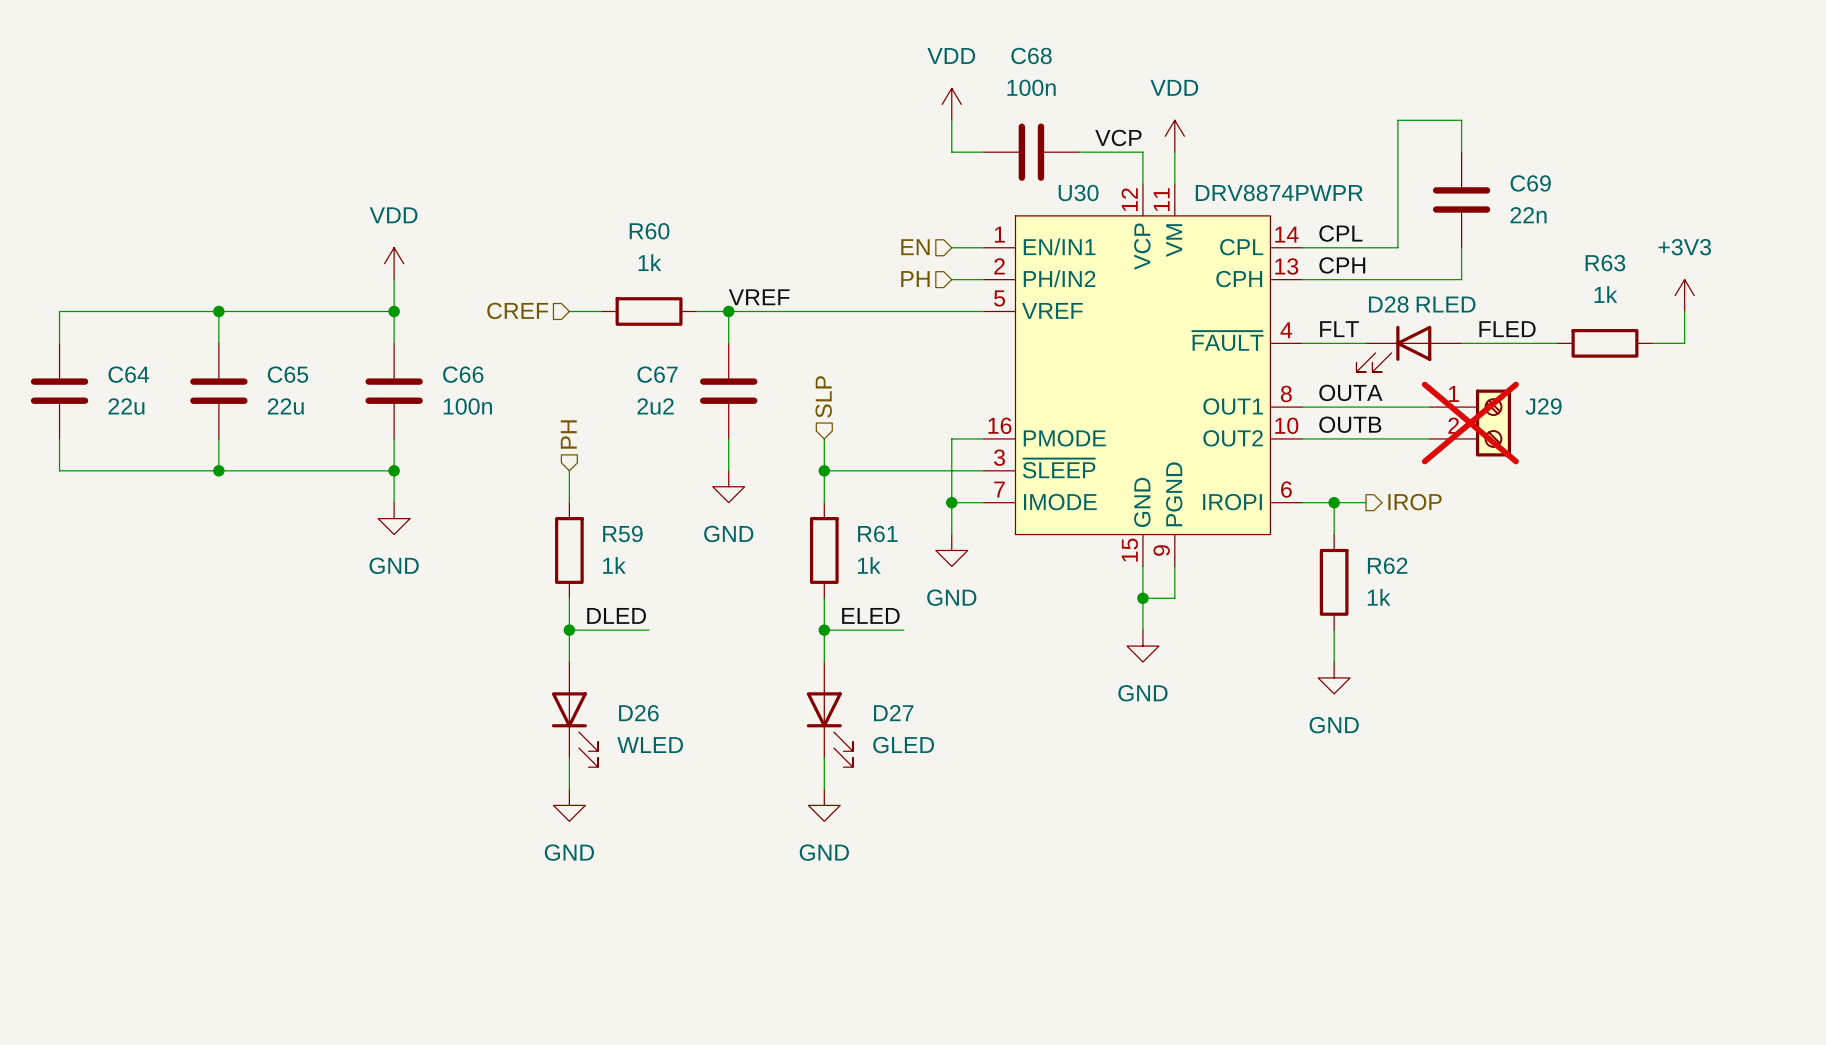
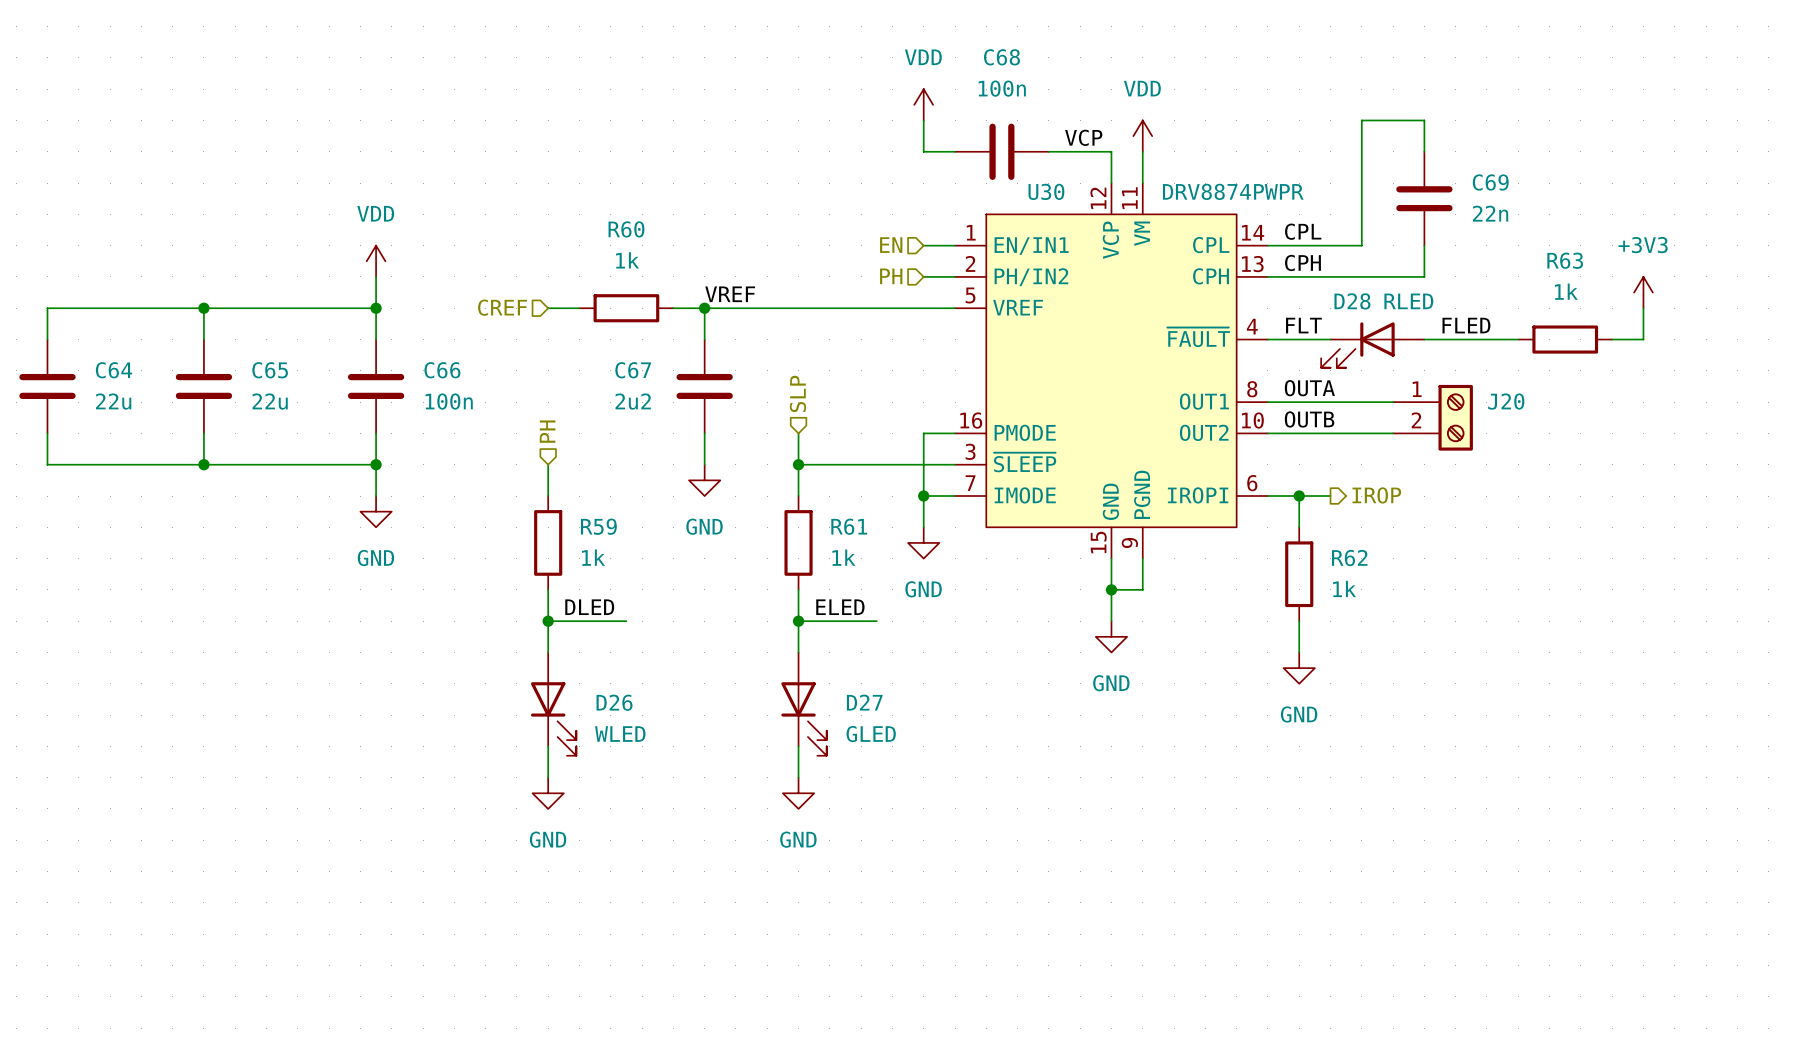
J29 name: J29 (1543, 406) -> J20 (1506, 401)
J29 do-not-place cross: (1470, 423) -> none

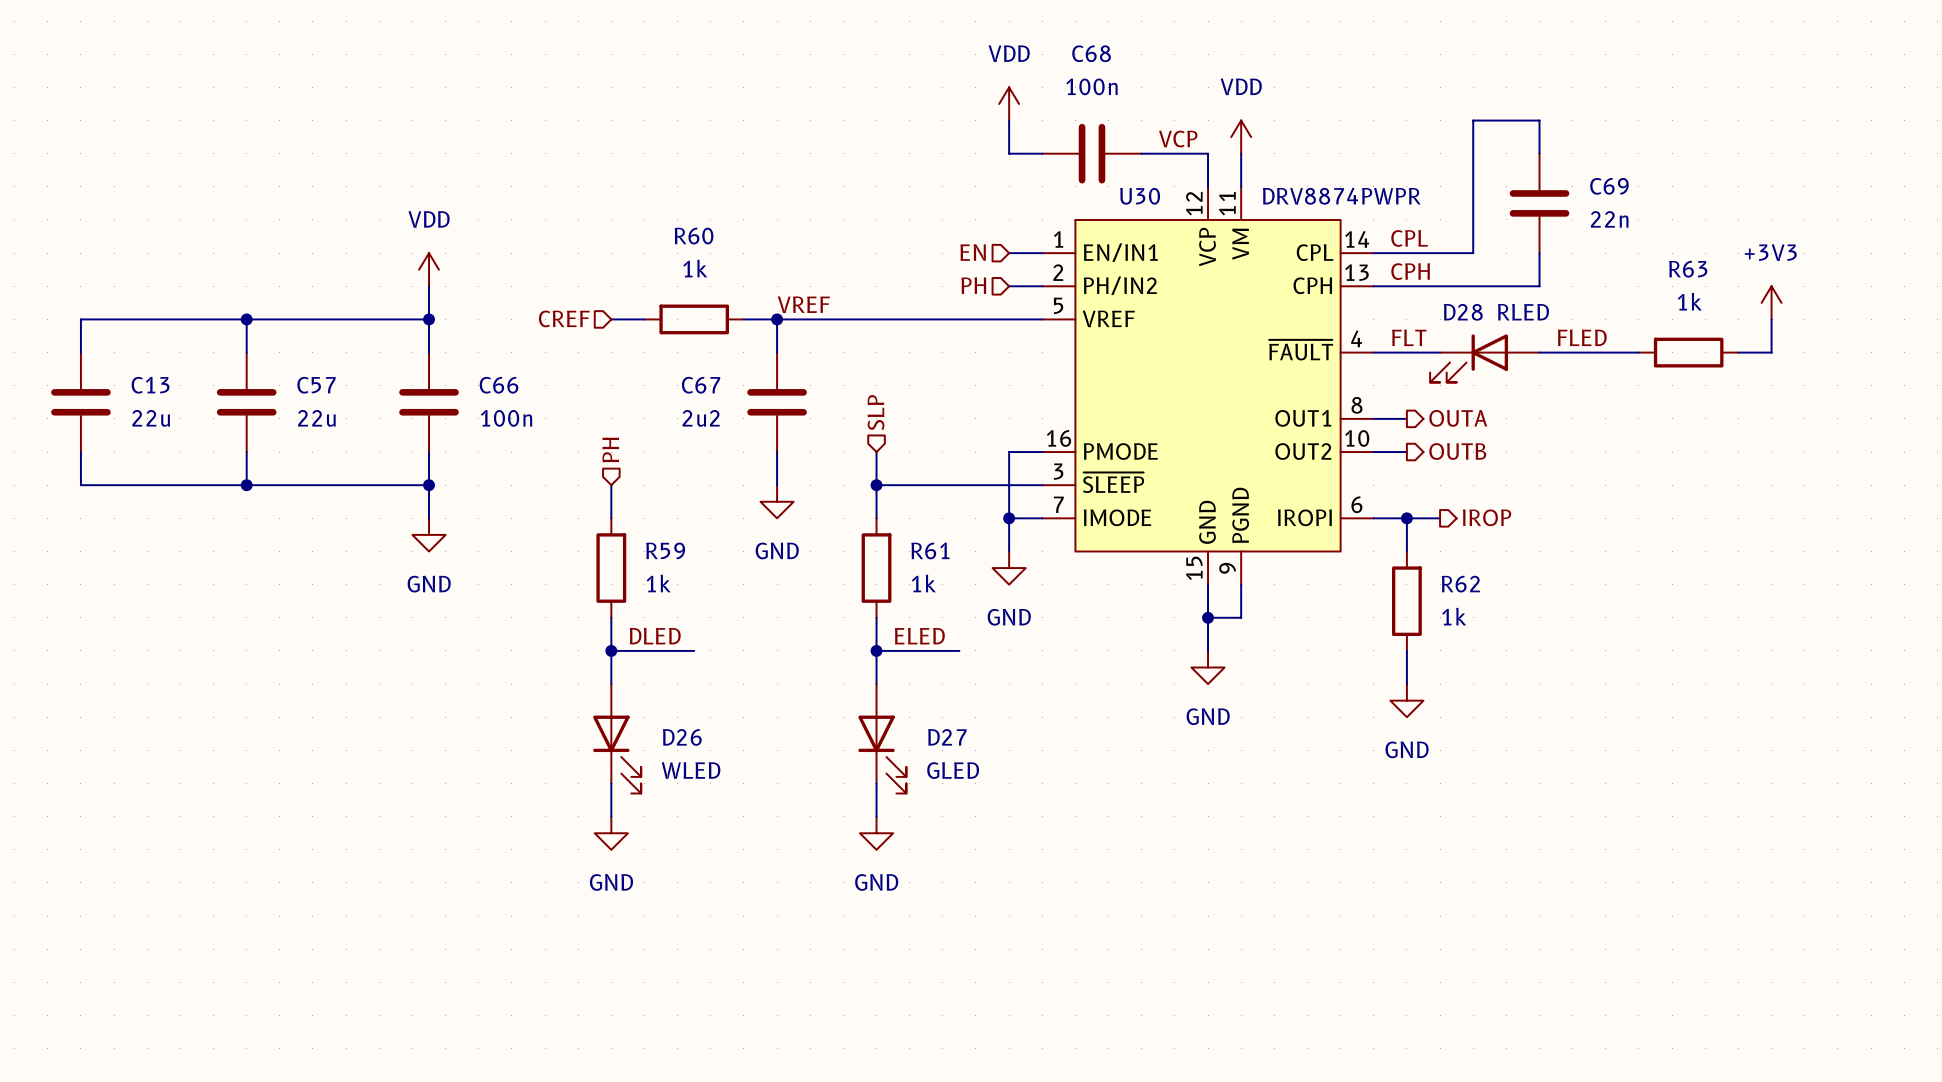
C64 name: C64 (114, 370) -> C13 (150, 385)
C65 name: C65 (270, 370) -> C57 (316, 385)
label: OUTA (1309, 388) -> none
hierarchical label: none -> OUTA (1458, 418)
wire: (1299, 402) (1393, 402) -> none
J20: (1433, 417) -> none
label: OUTB (1309, 419) -> none
hierarchical label: none -> OUTB (1457, 451)
wire: (1299, 433) (1393, 433) -> none

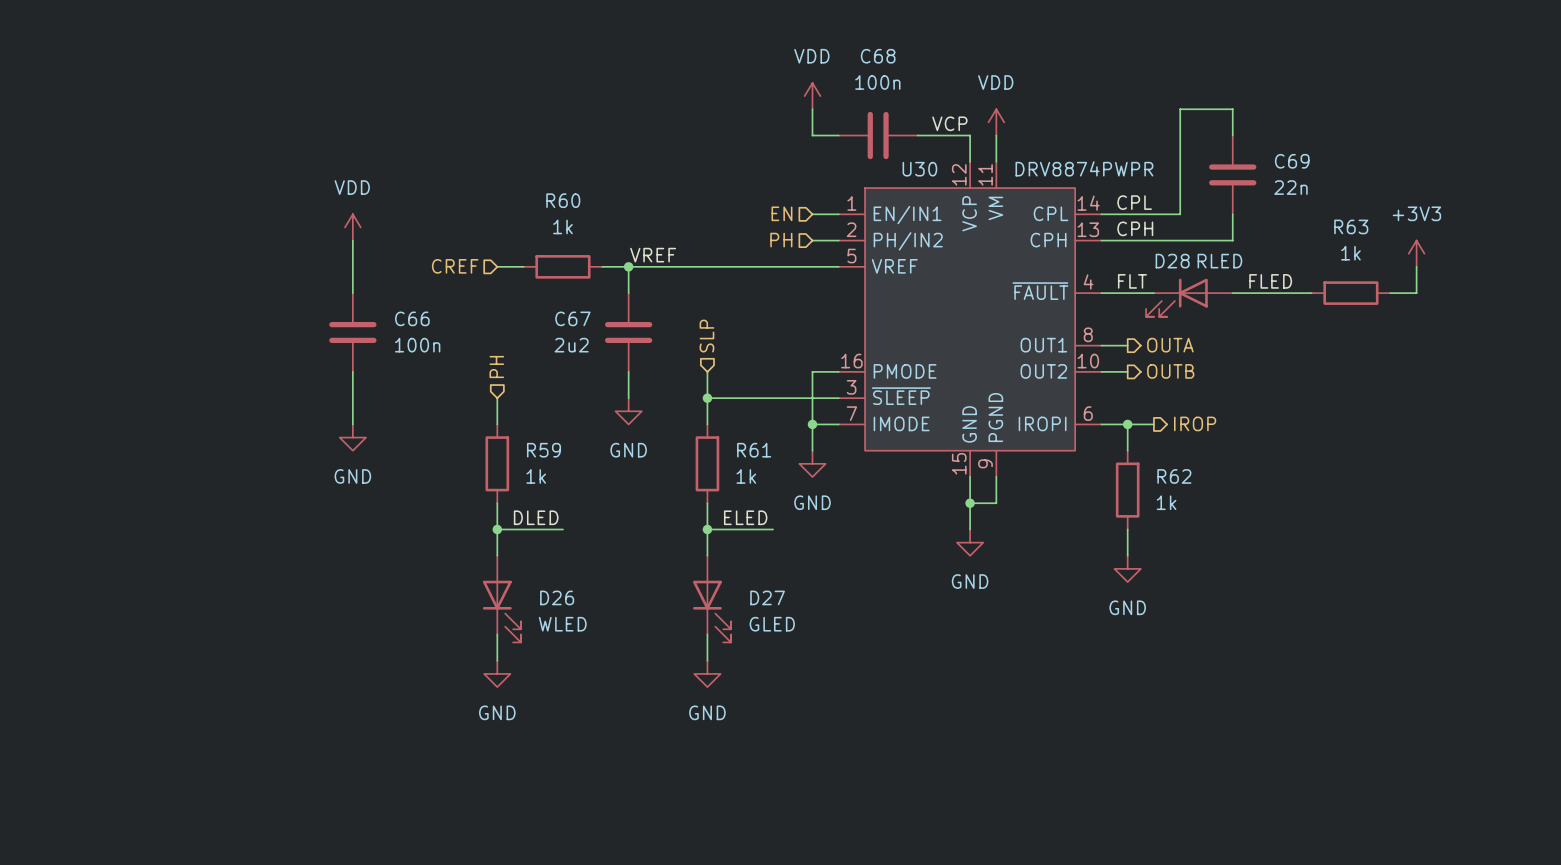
wire: (246, 319) (246, 352) -> none
junction: (246, 319) -> none
wire: (429, 319) (80, 319) (80, 352) -> none
junction: (429, 319) -> none
C13: 22u (80, 402) -> none
C57: 22u (246, 402) -> none
wire: (80, 452) (80, 485) (429, 485) -> none
wire: (246, 452) (246, 485) -> none
junction: (246, 485) -> none
junction: (429, 485) -> none

